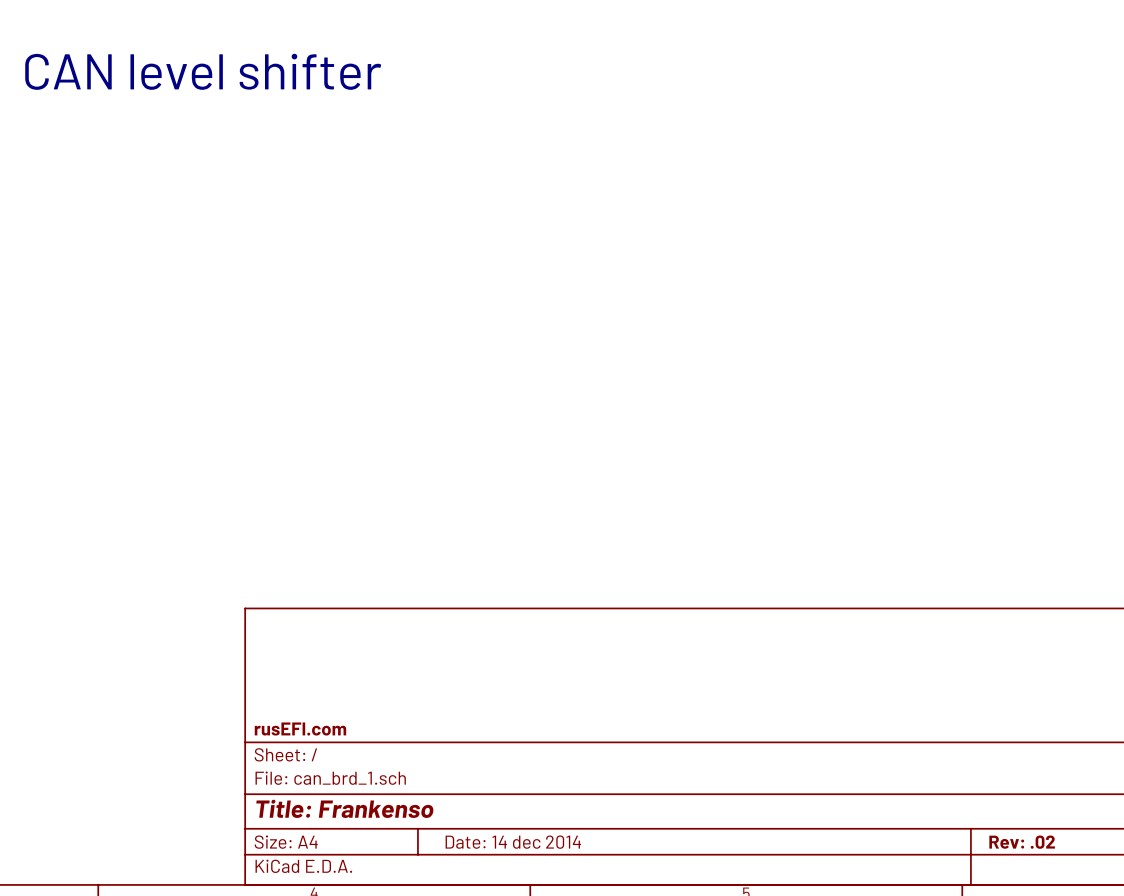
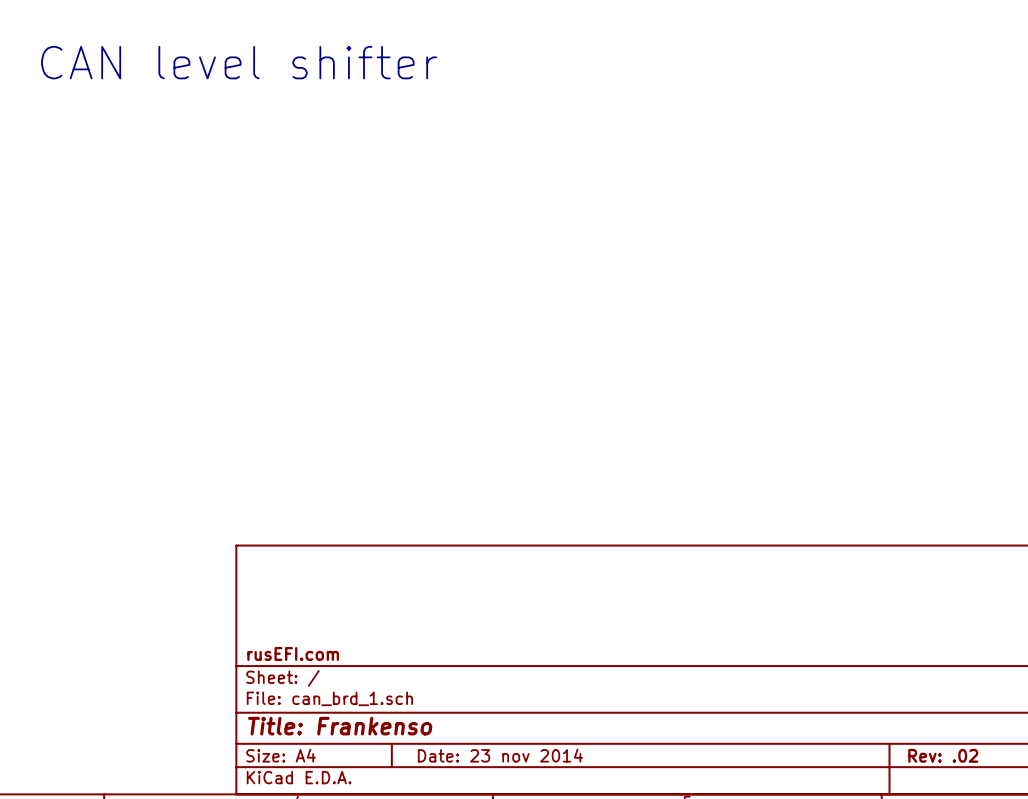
title block: Date: 14 dec 2014 (513, 842) -> Date: 23 nov 2014 (500, 755)

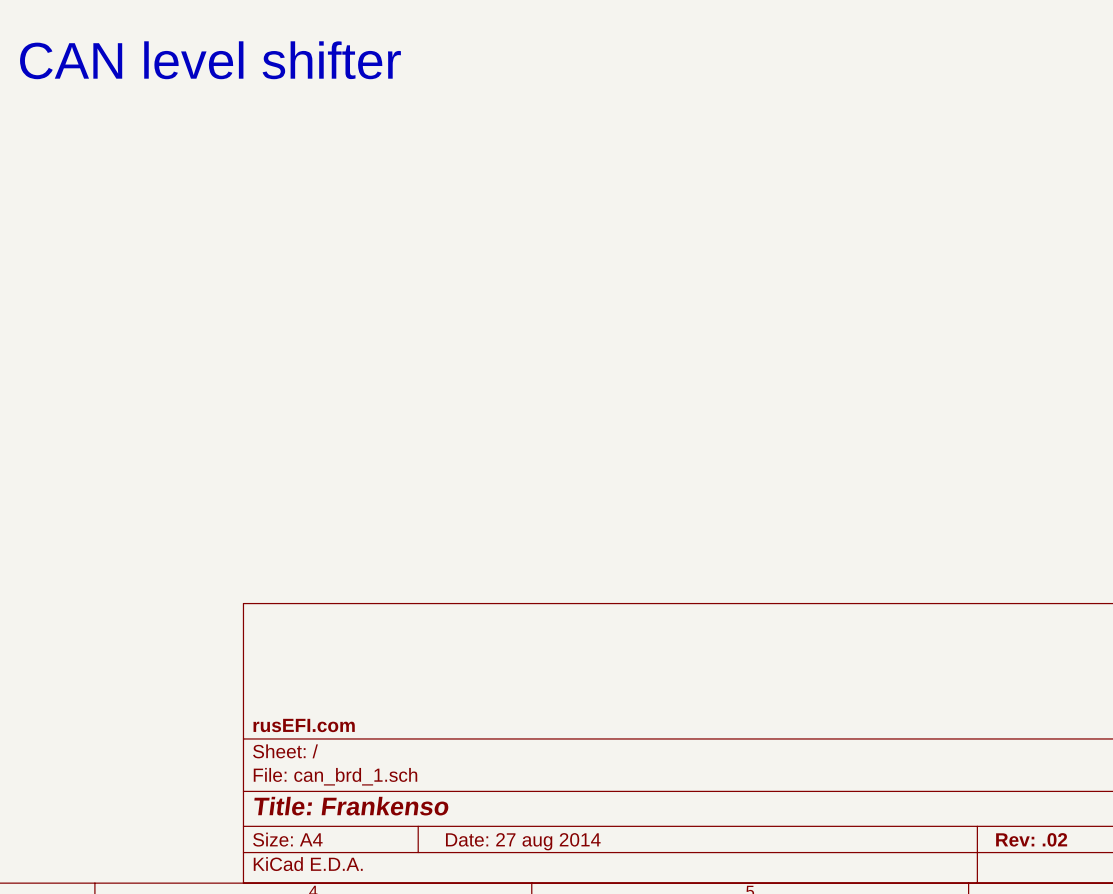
title block: Date: 23 nov 2014 (500, 755) -> Date: 27 aug 2014 (523, 841)

